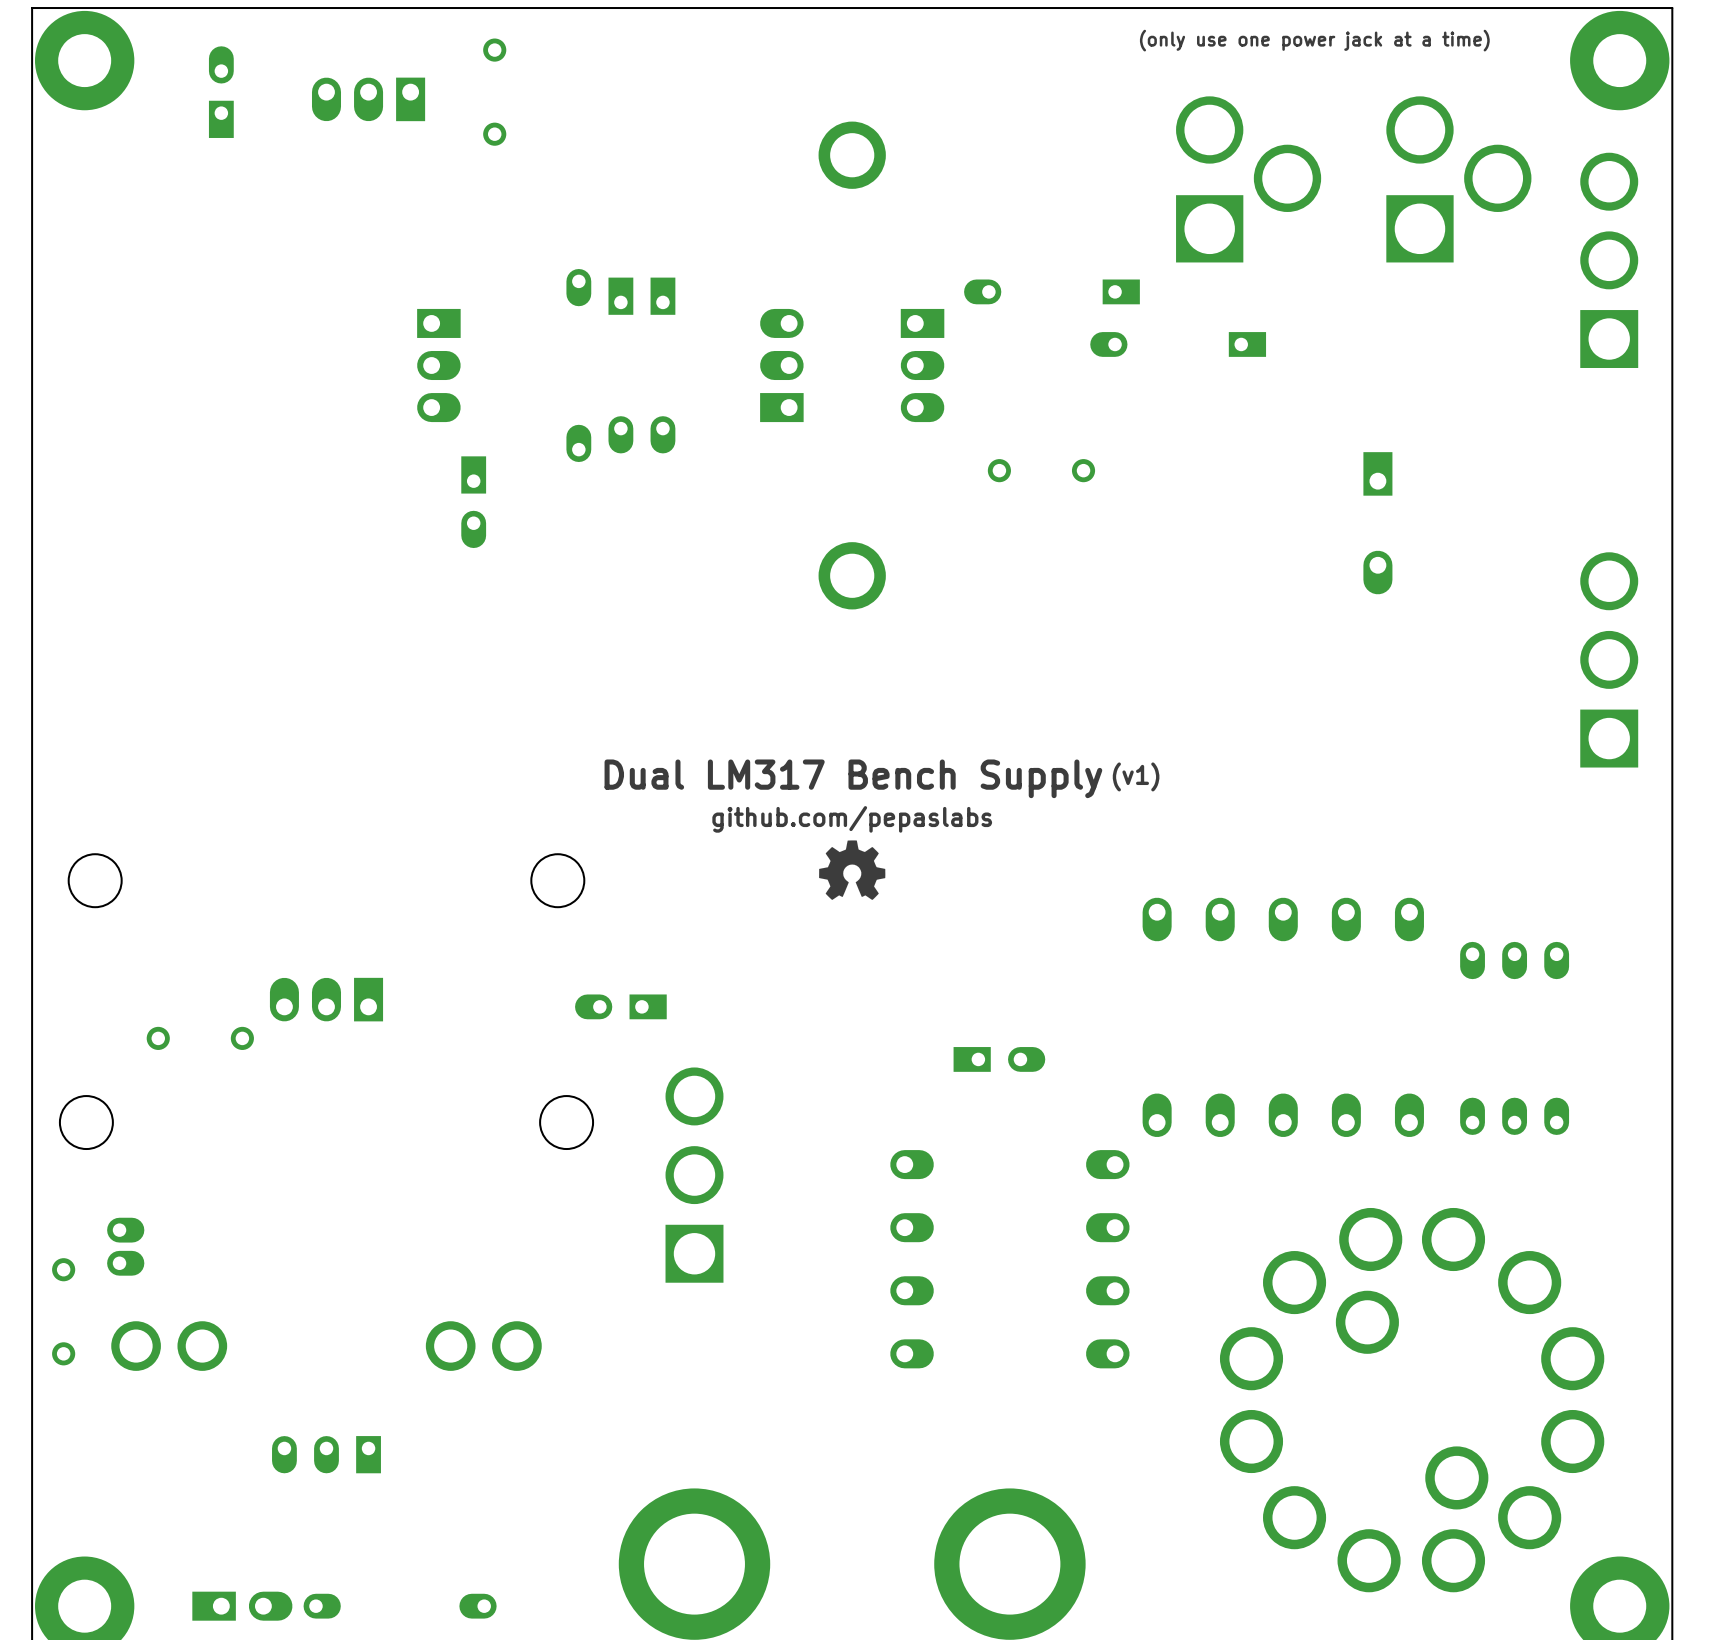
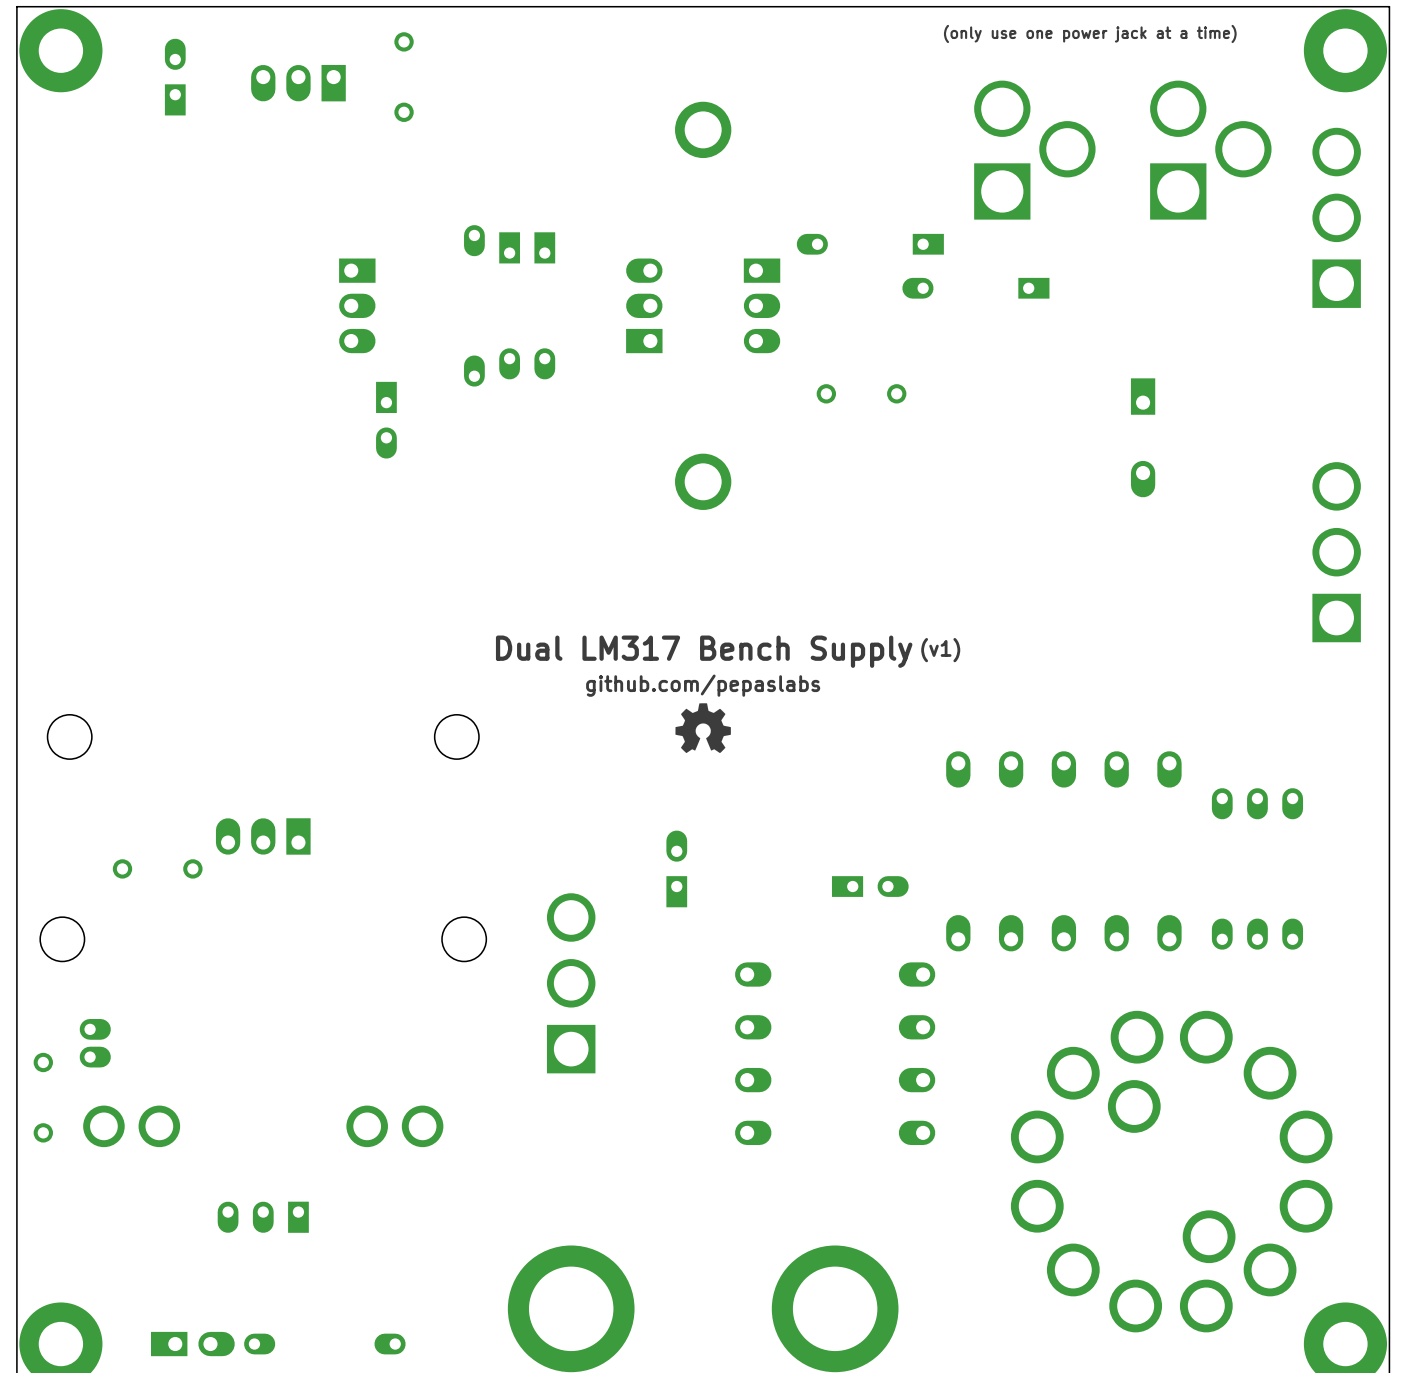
part: (620, 1006) -> none
part: none -> (676, 868)
part position: (999, 1059) -> (870, 886)

